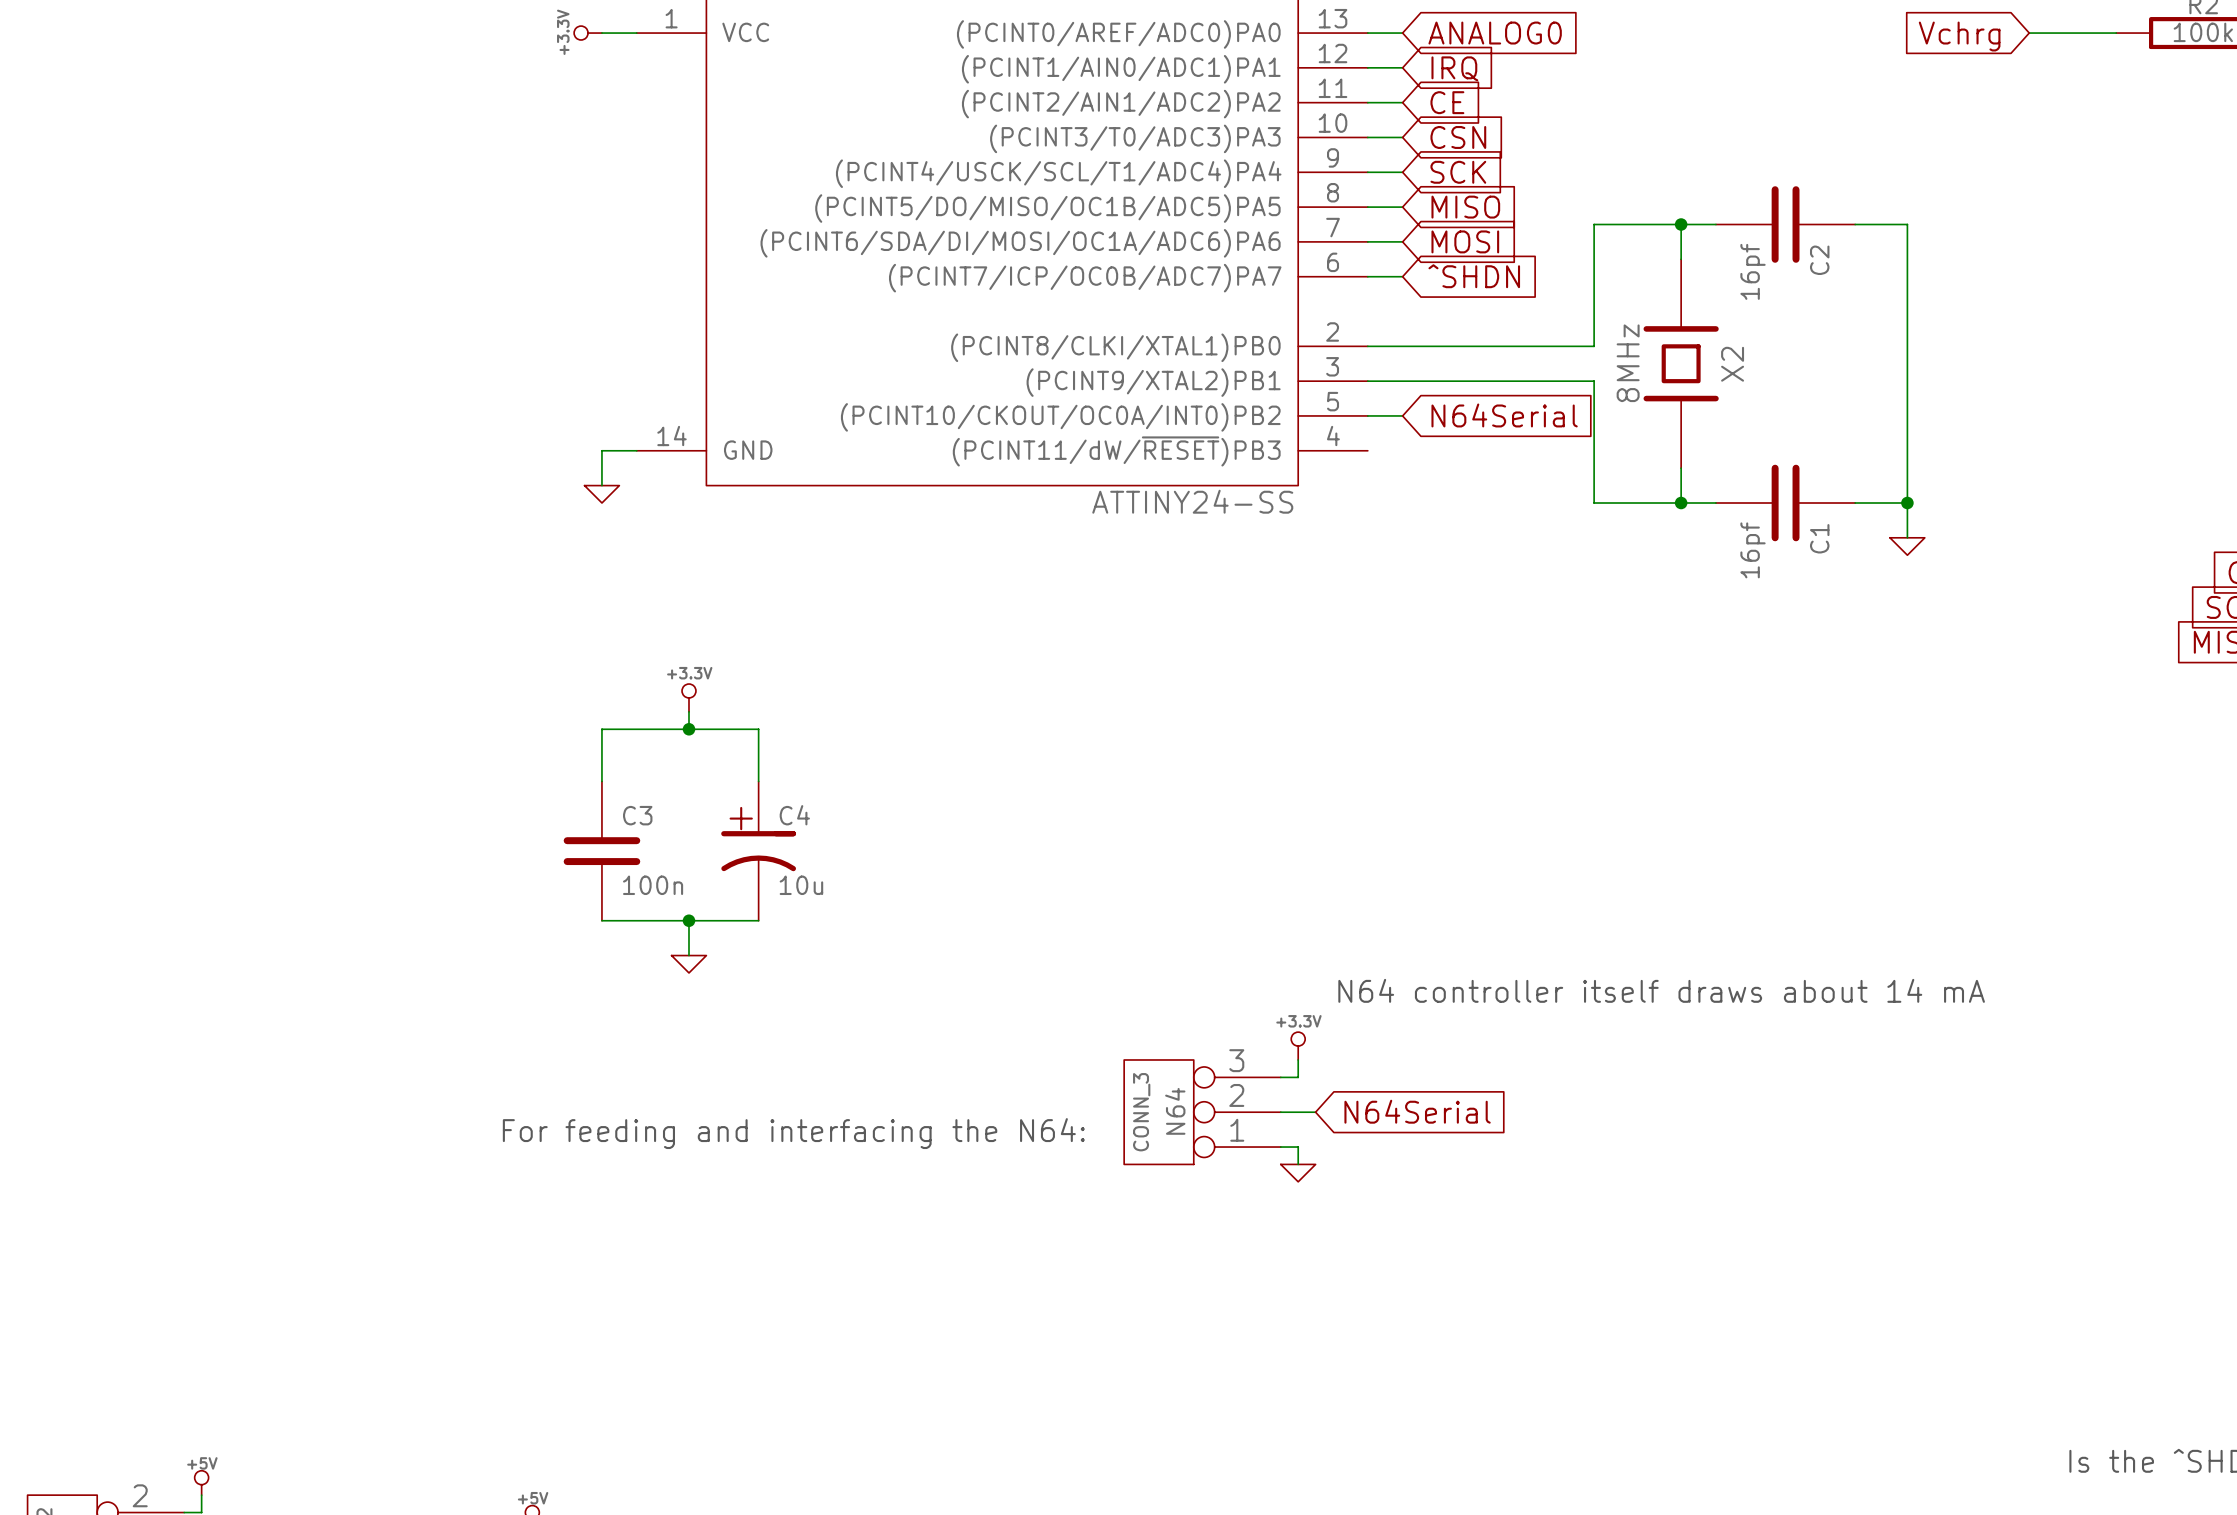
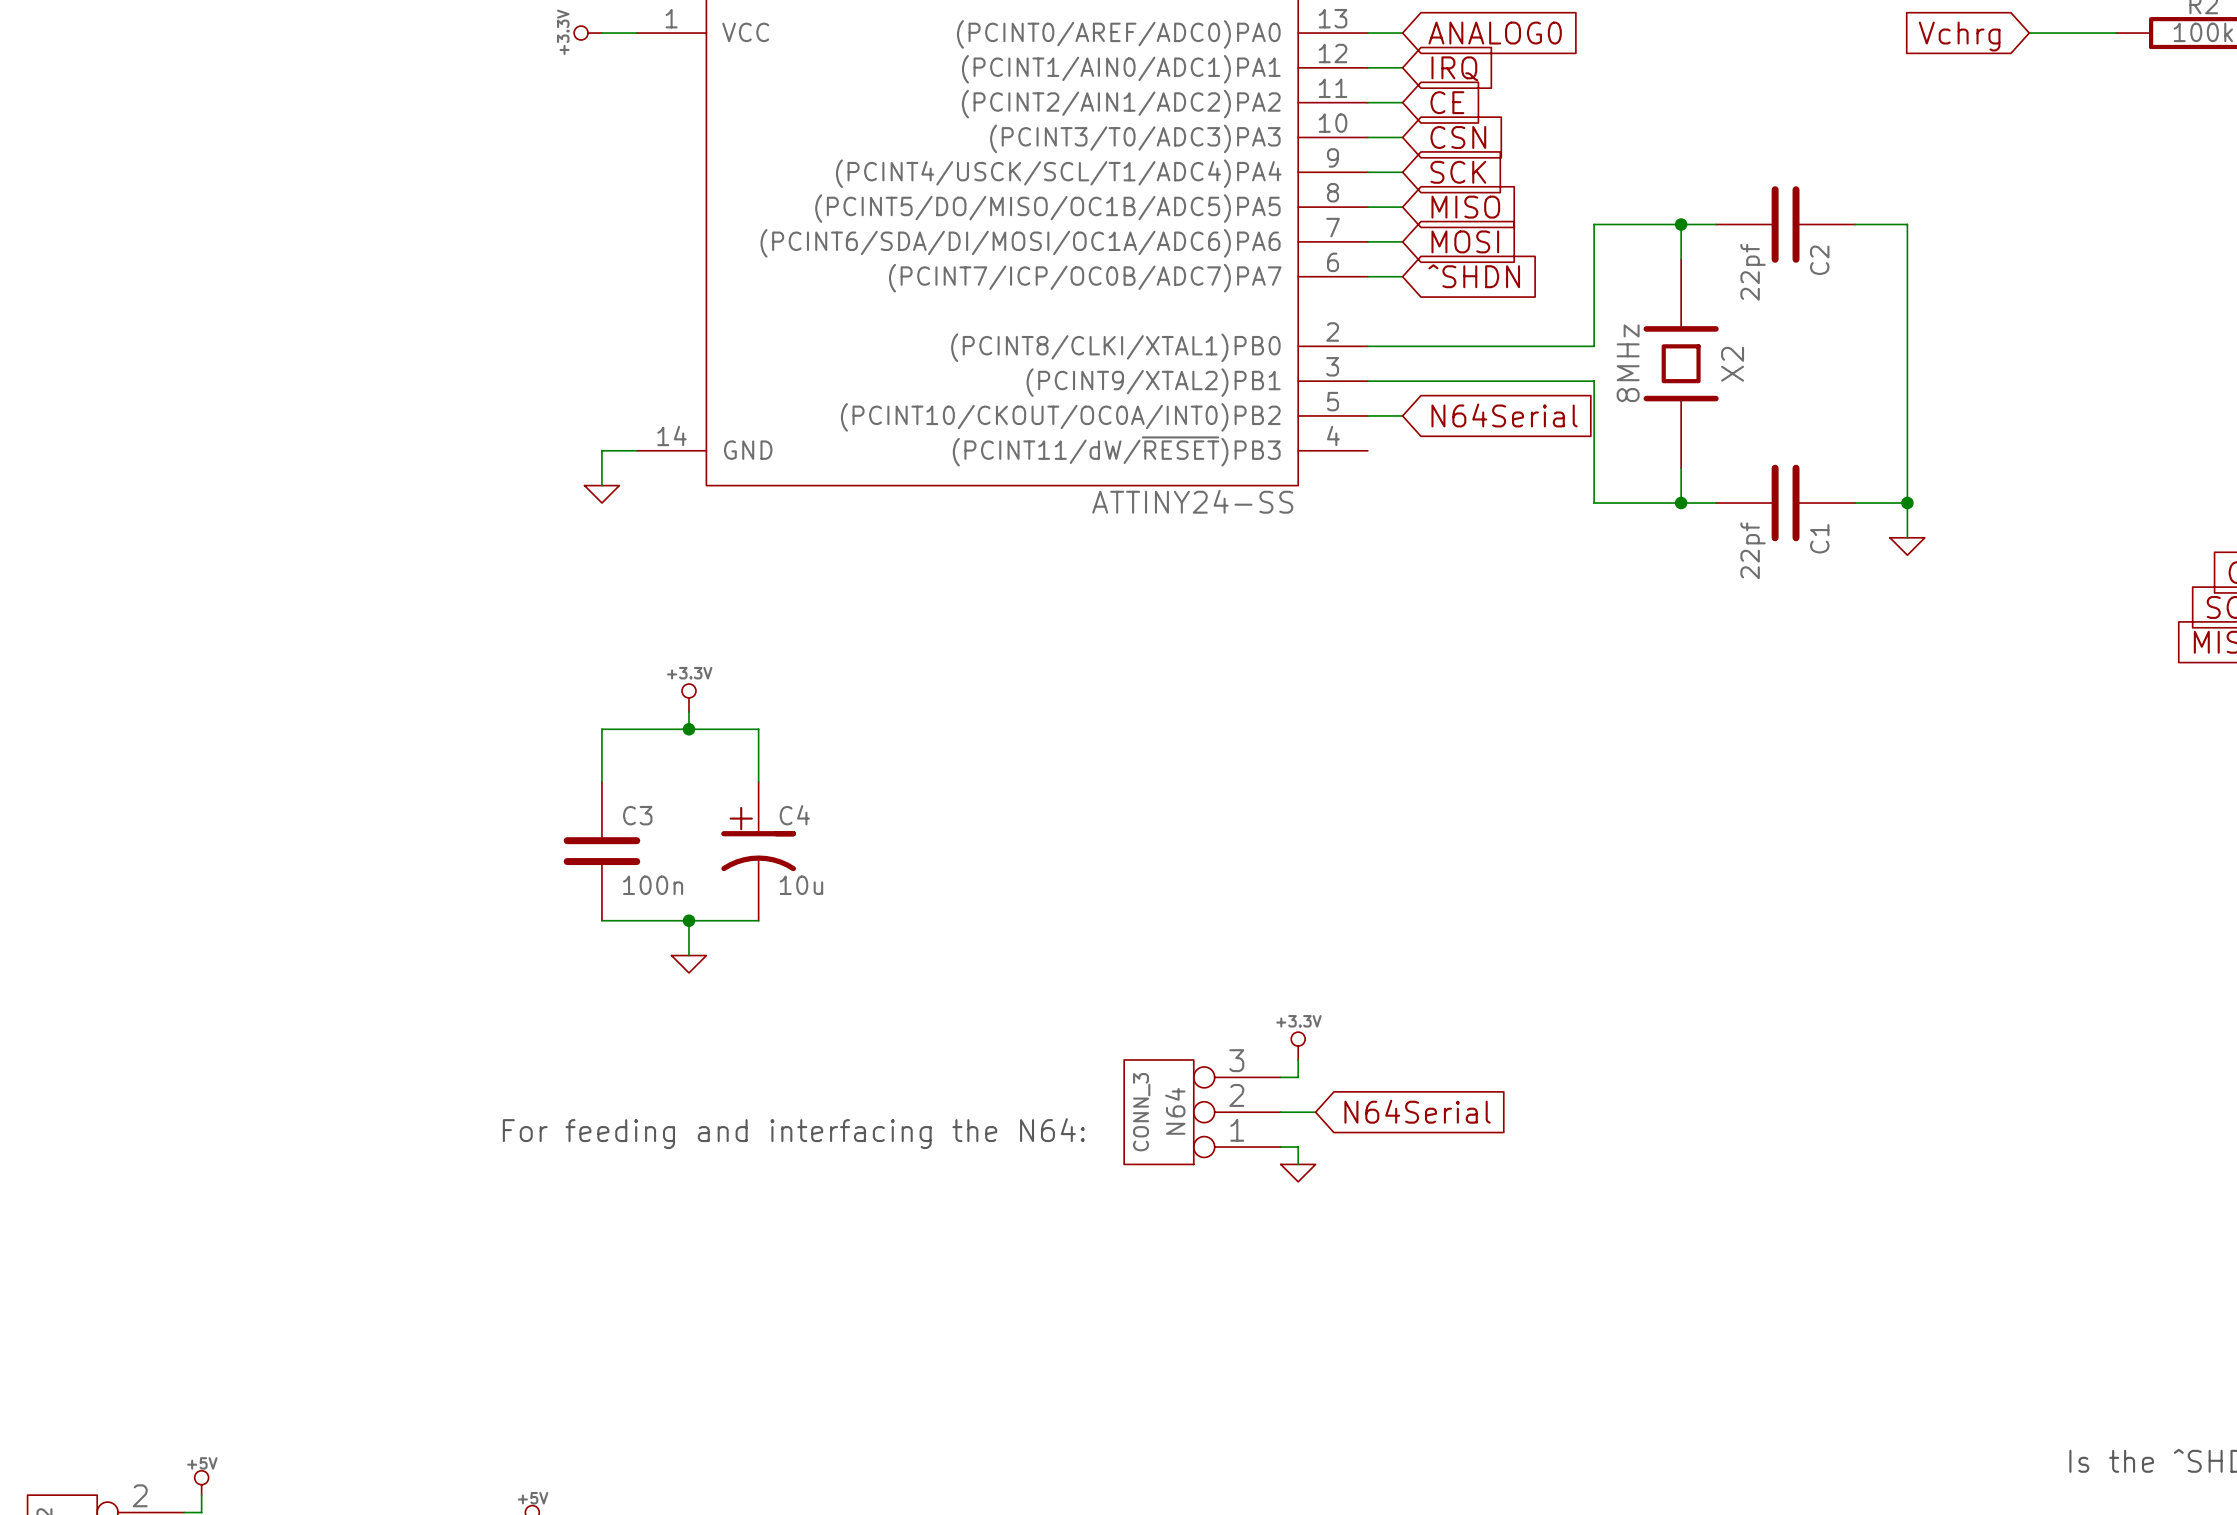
C2 value: 16pf (1753, 271) -> 22pf (1753, 272)
C1 value: 16pf (1753, 550) -> 22pf (1753, 550)
text: N64 controller itself draws about 14 mA (1661, 990) -> none

